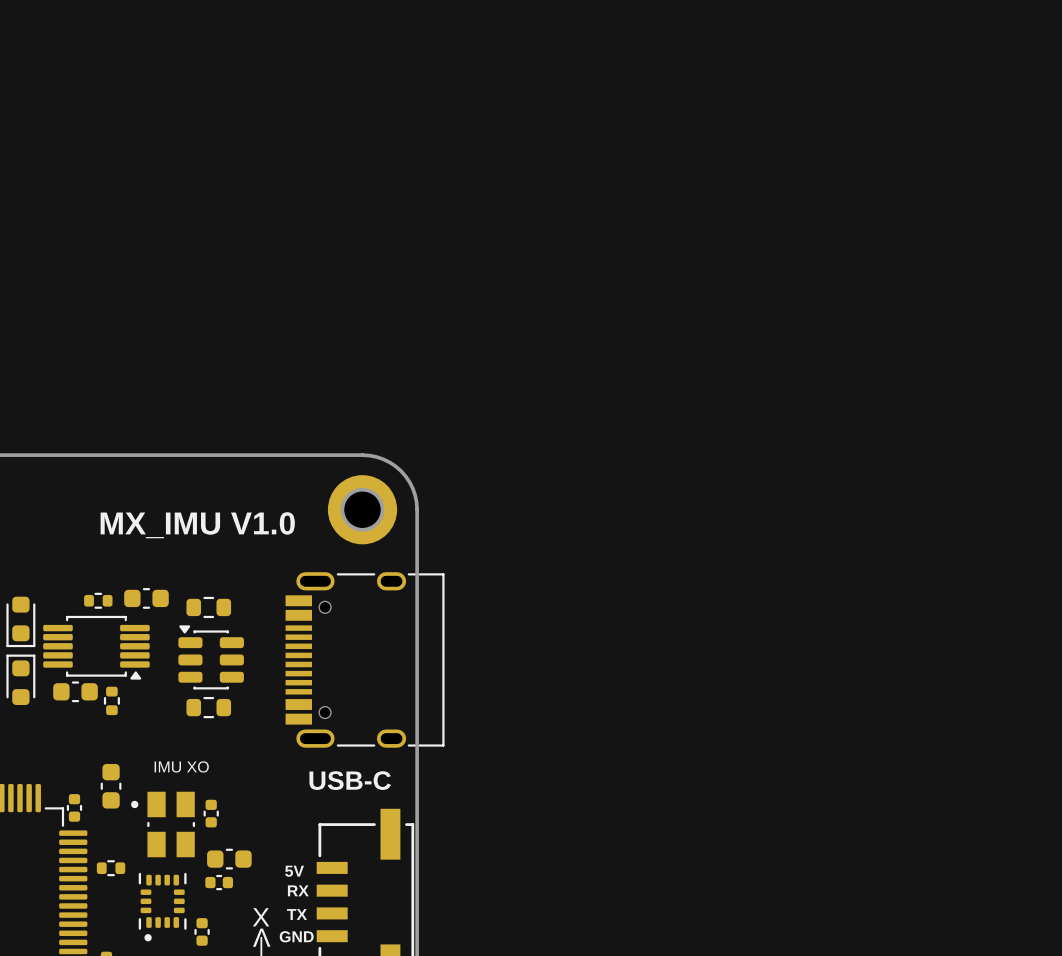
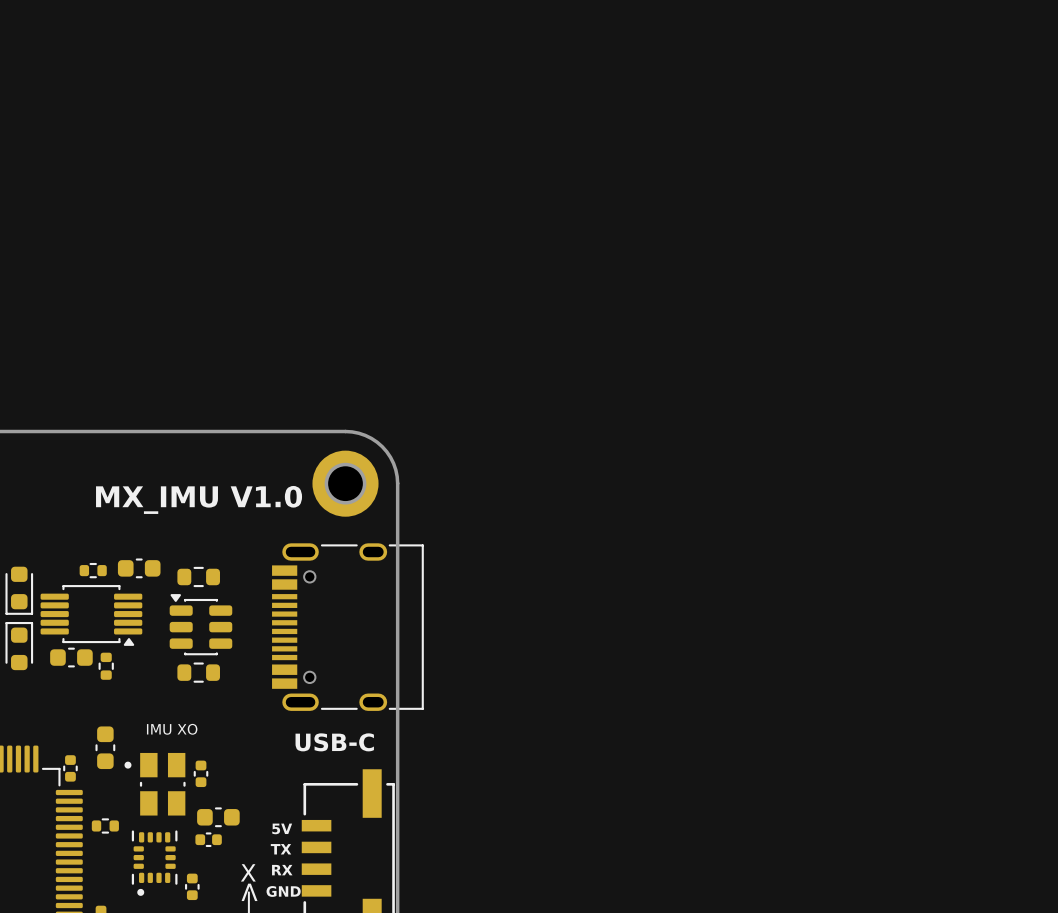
text: RX (298, 890) -> TX (281, 849)
text: TX (297, 914) -> RX (282, 870)

